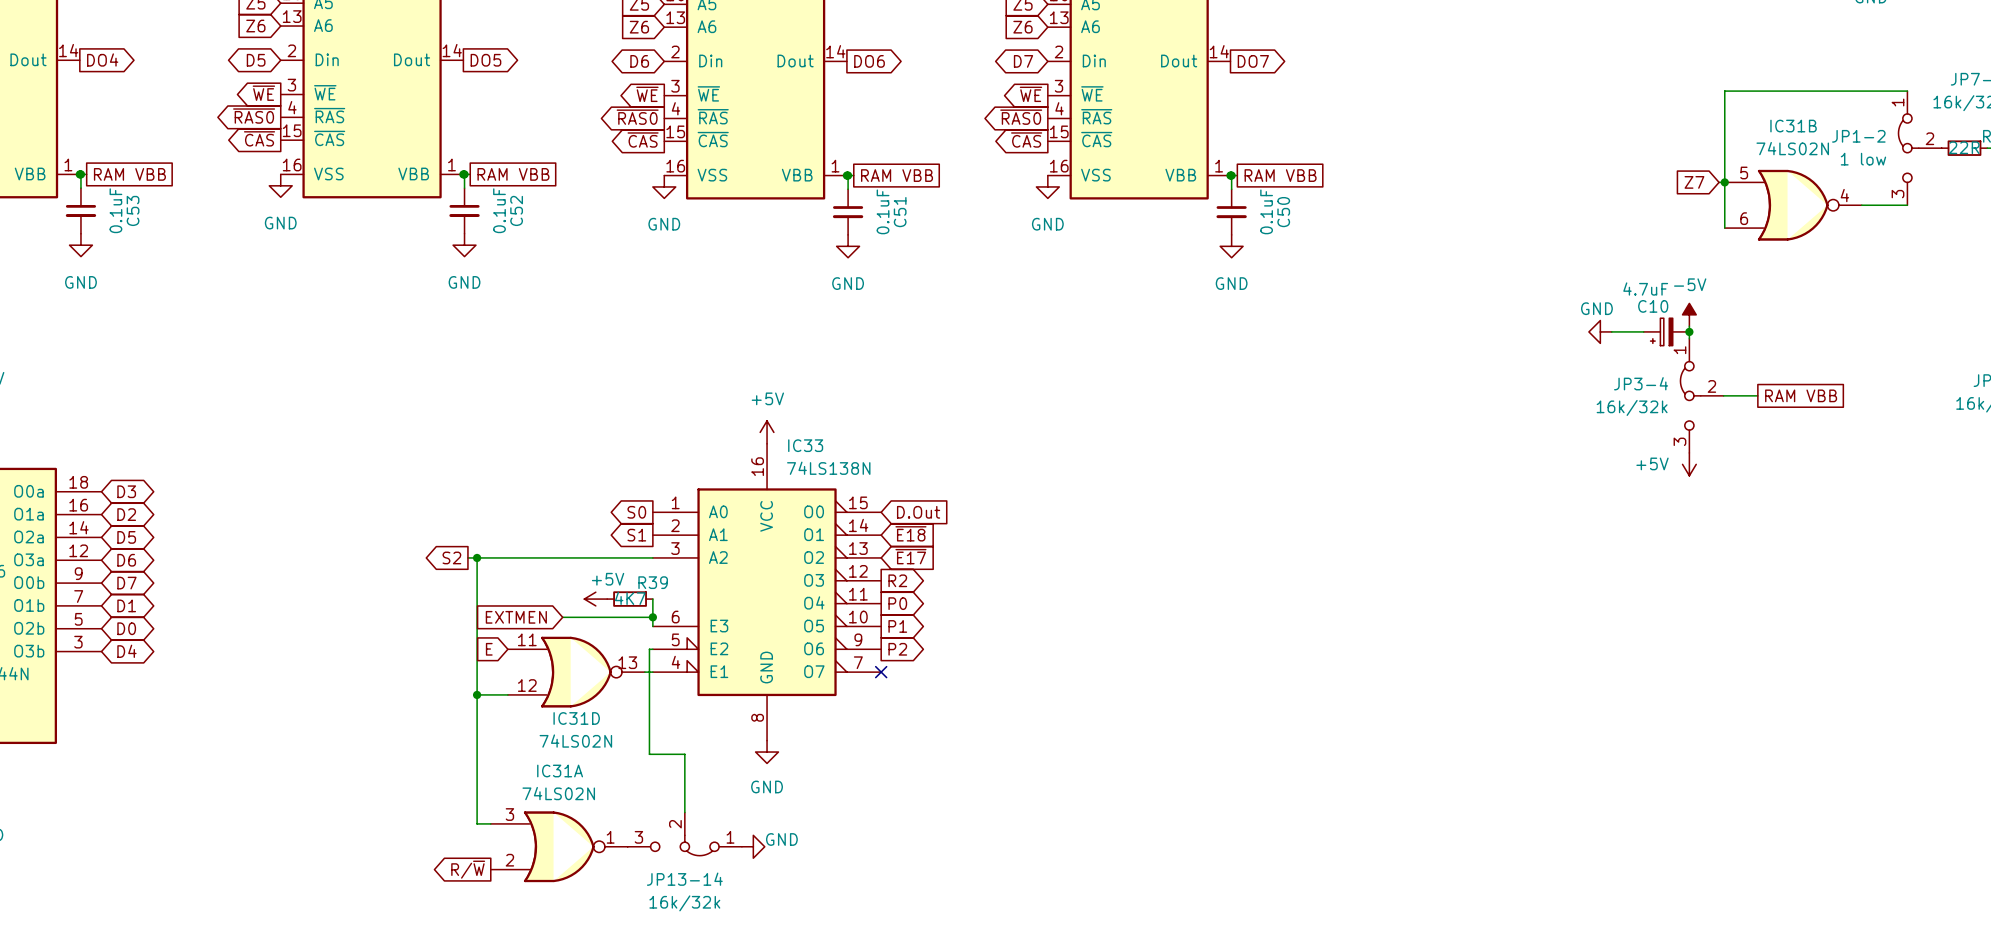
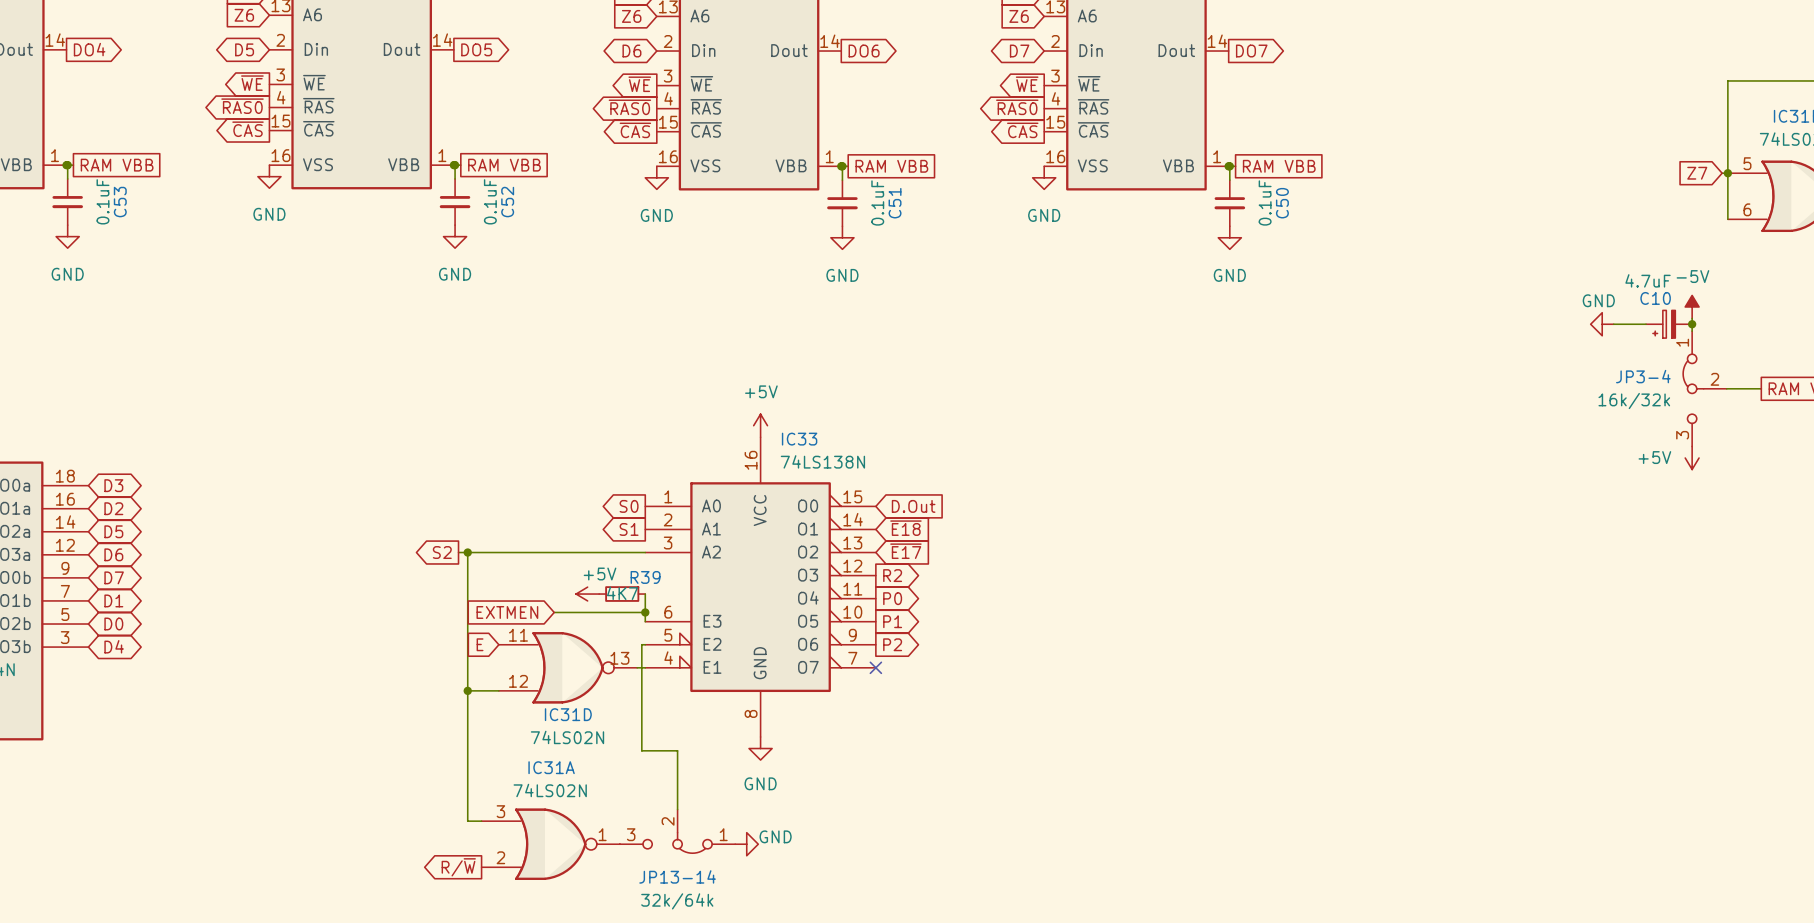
JP13-14 value: 16k/32k (684, 903) -> 32k/64k (677, 901)

